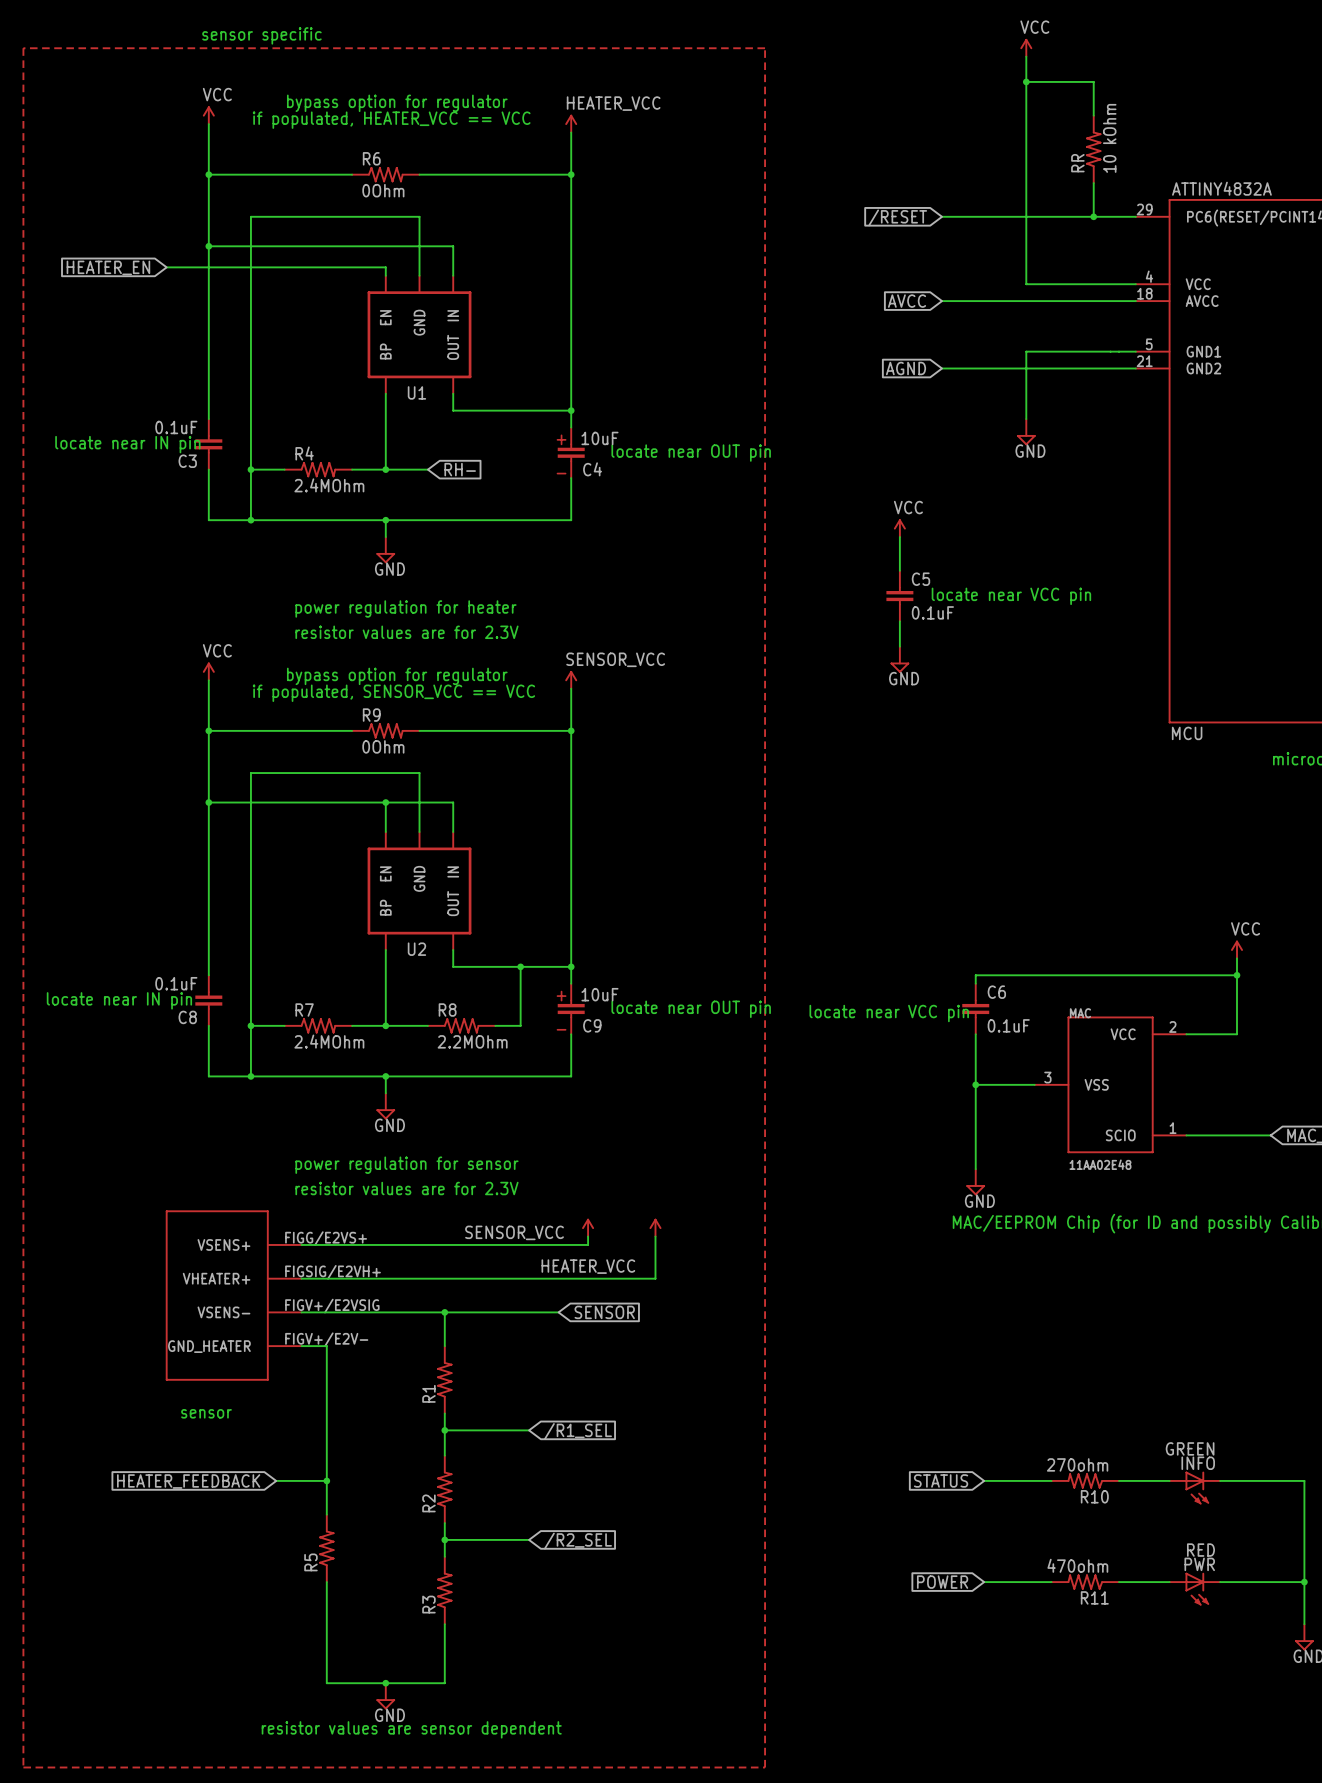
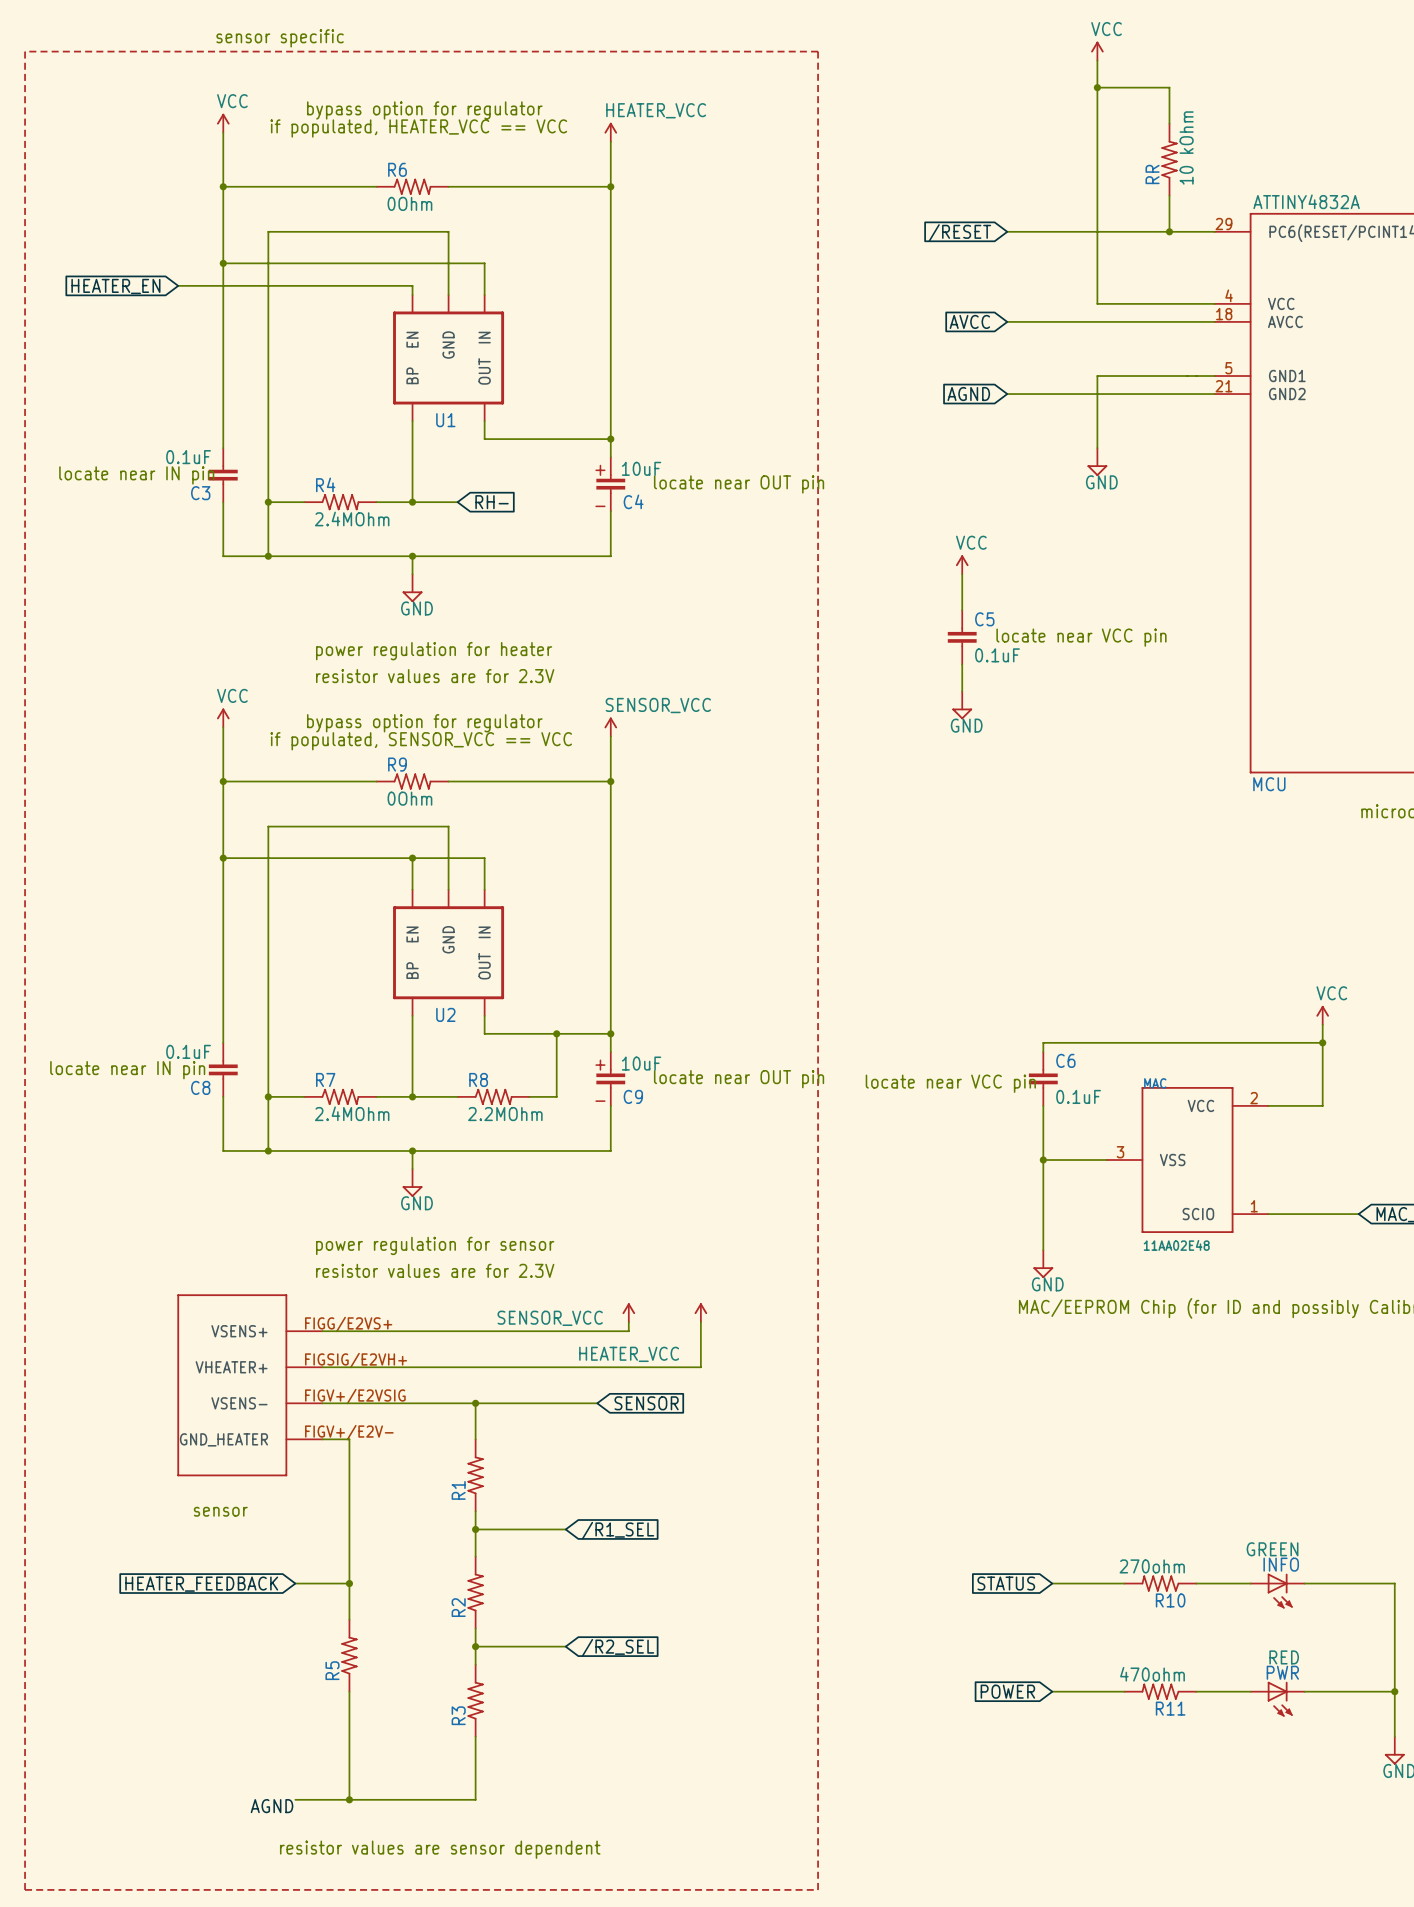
wire: none -> (295, 1799) (349, 1799)
junction: none -> (349, 1799)
junction: (385, 1683) -> none
label: none -> AGND (272, 1806)
power symbol: GND (385, 1696) -> none

